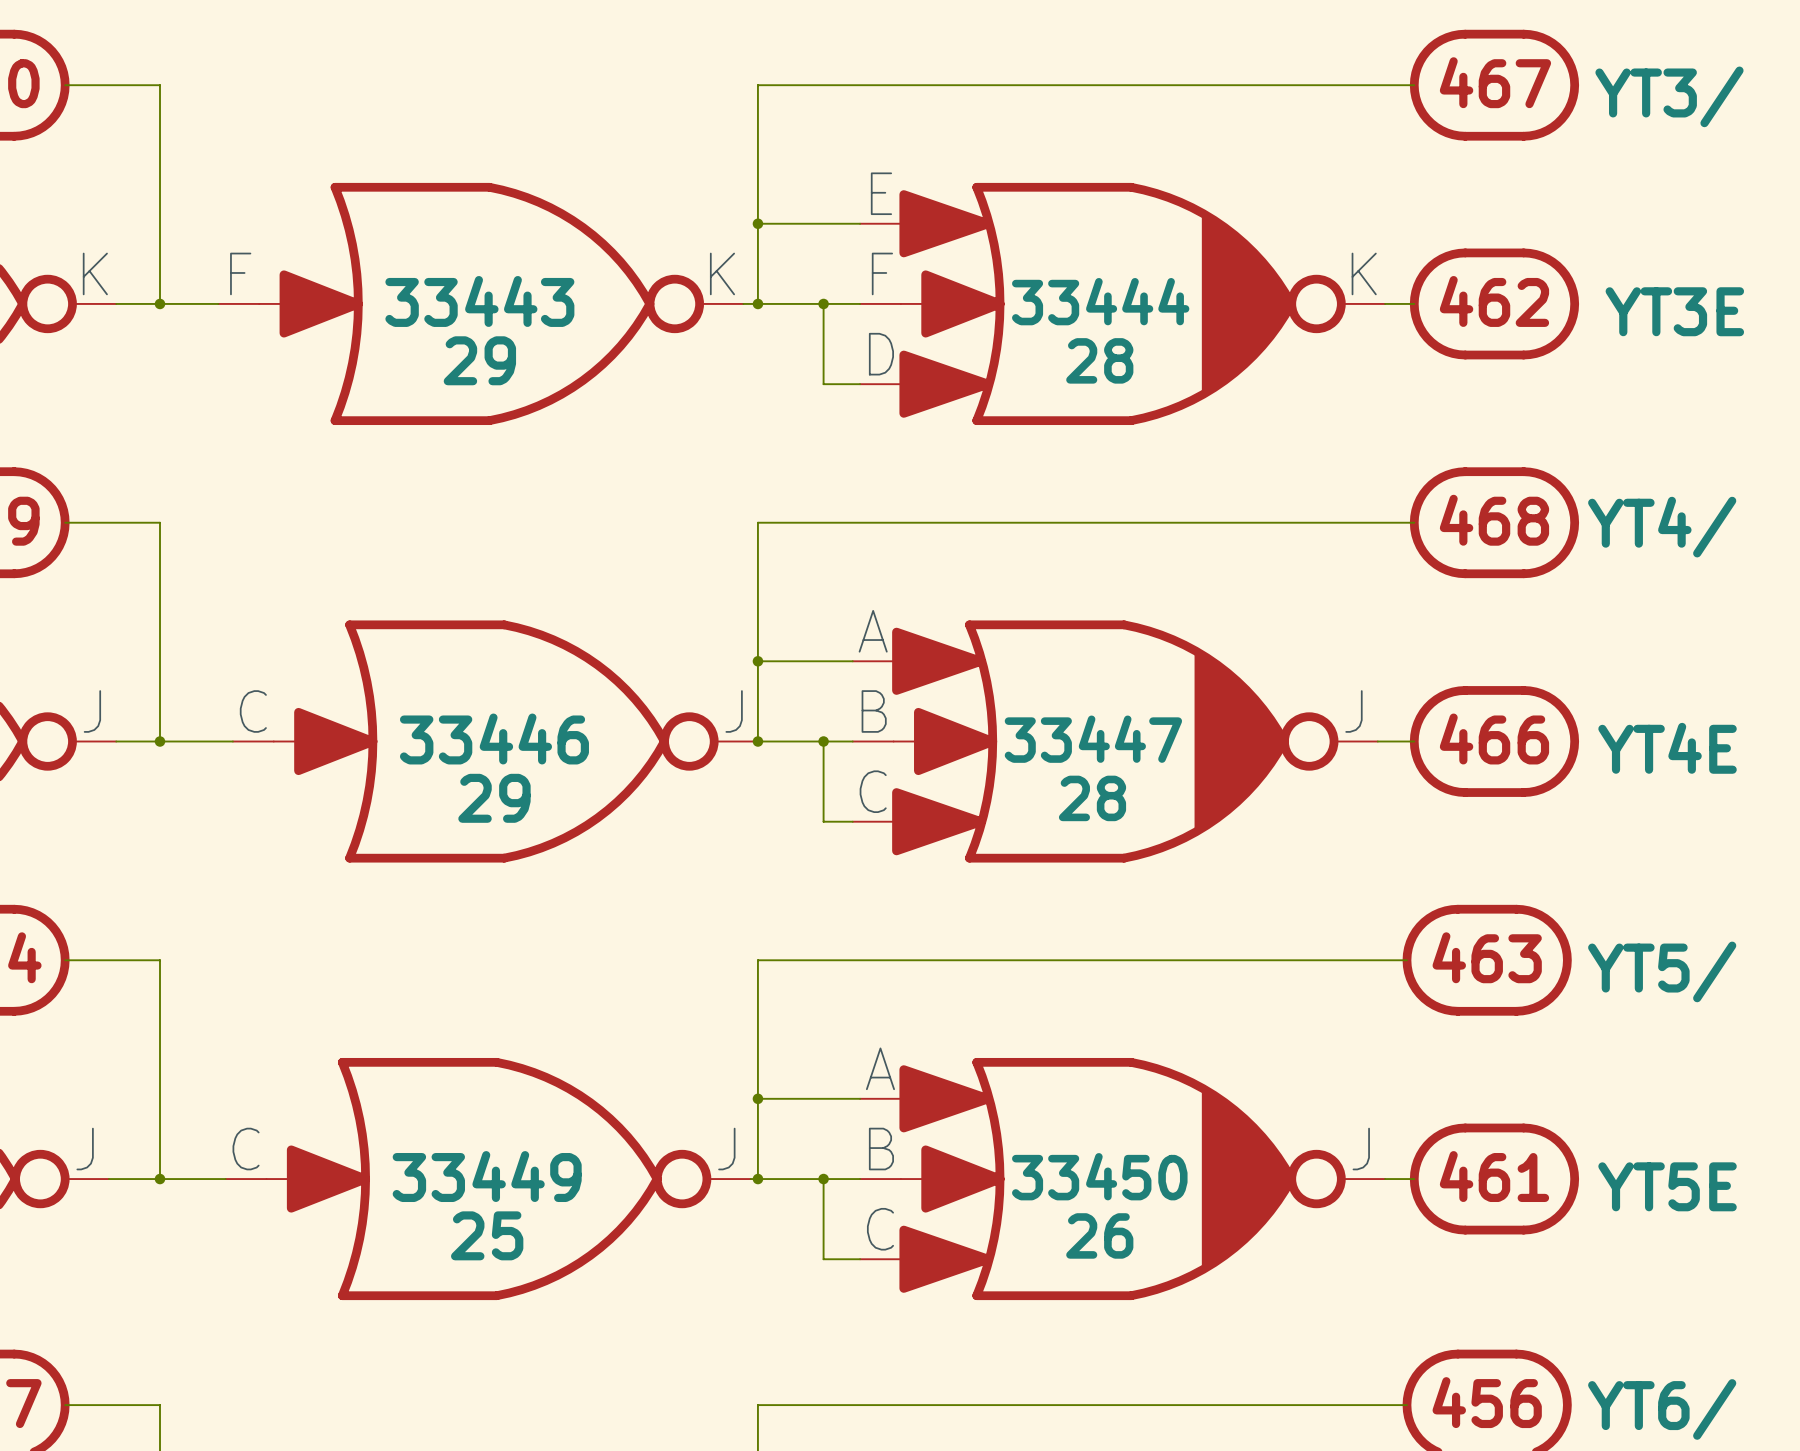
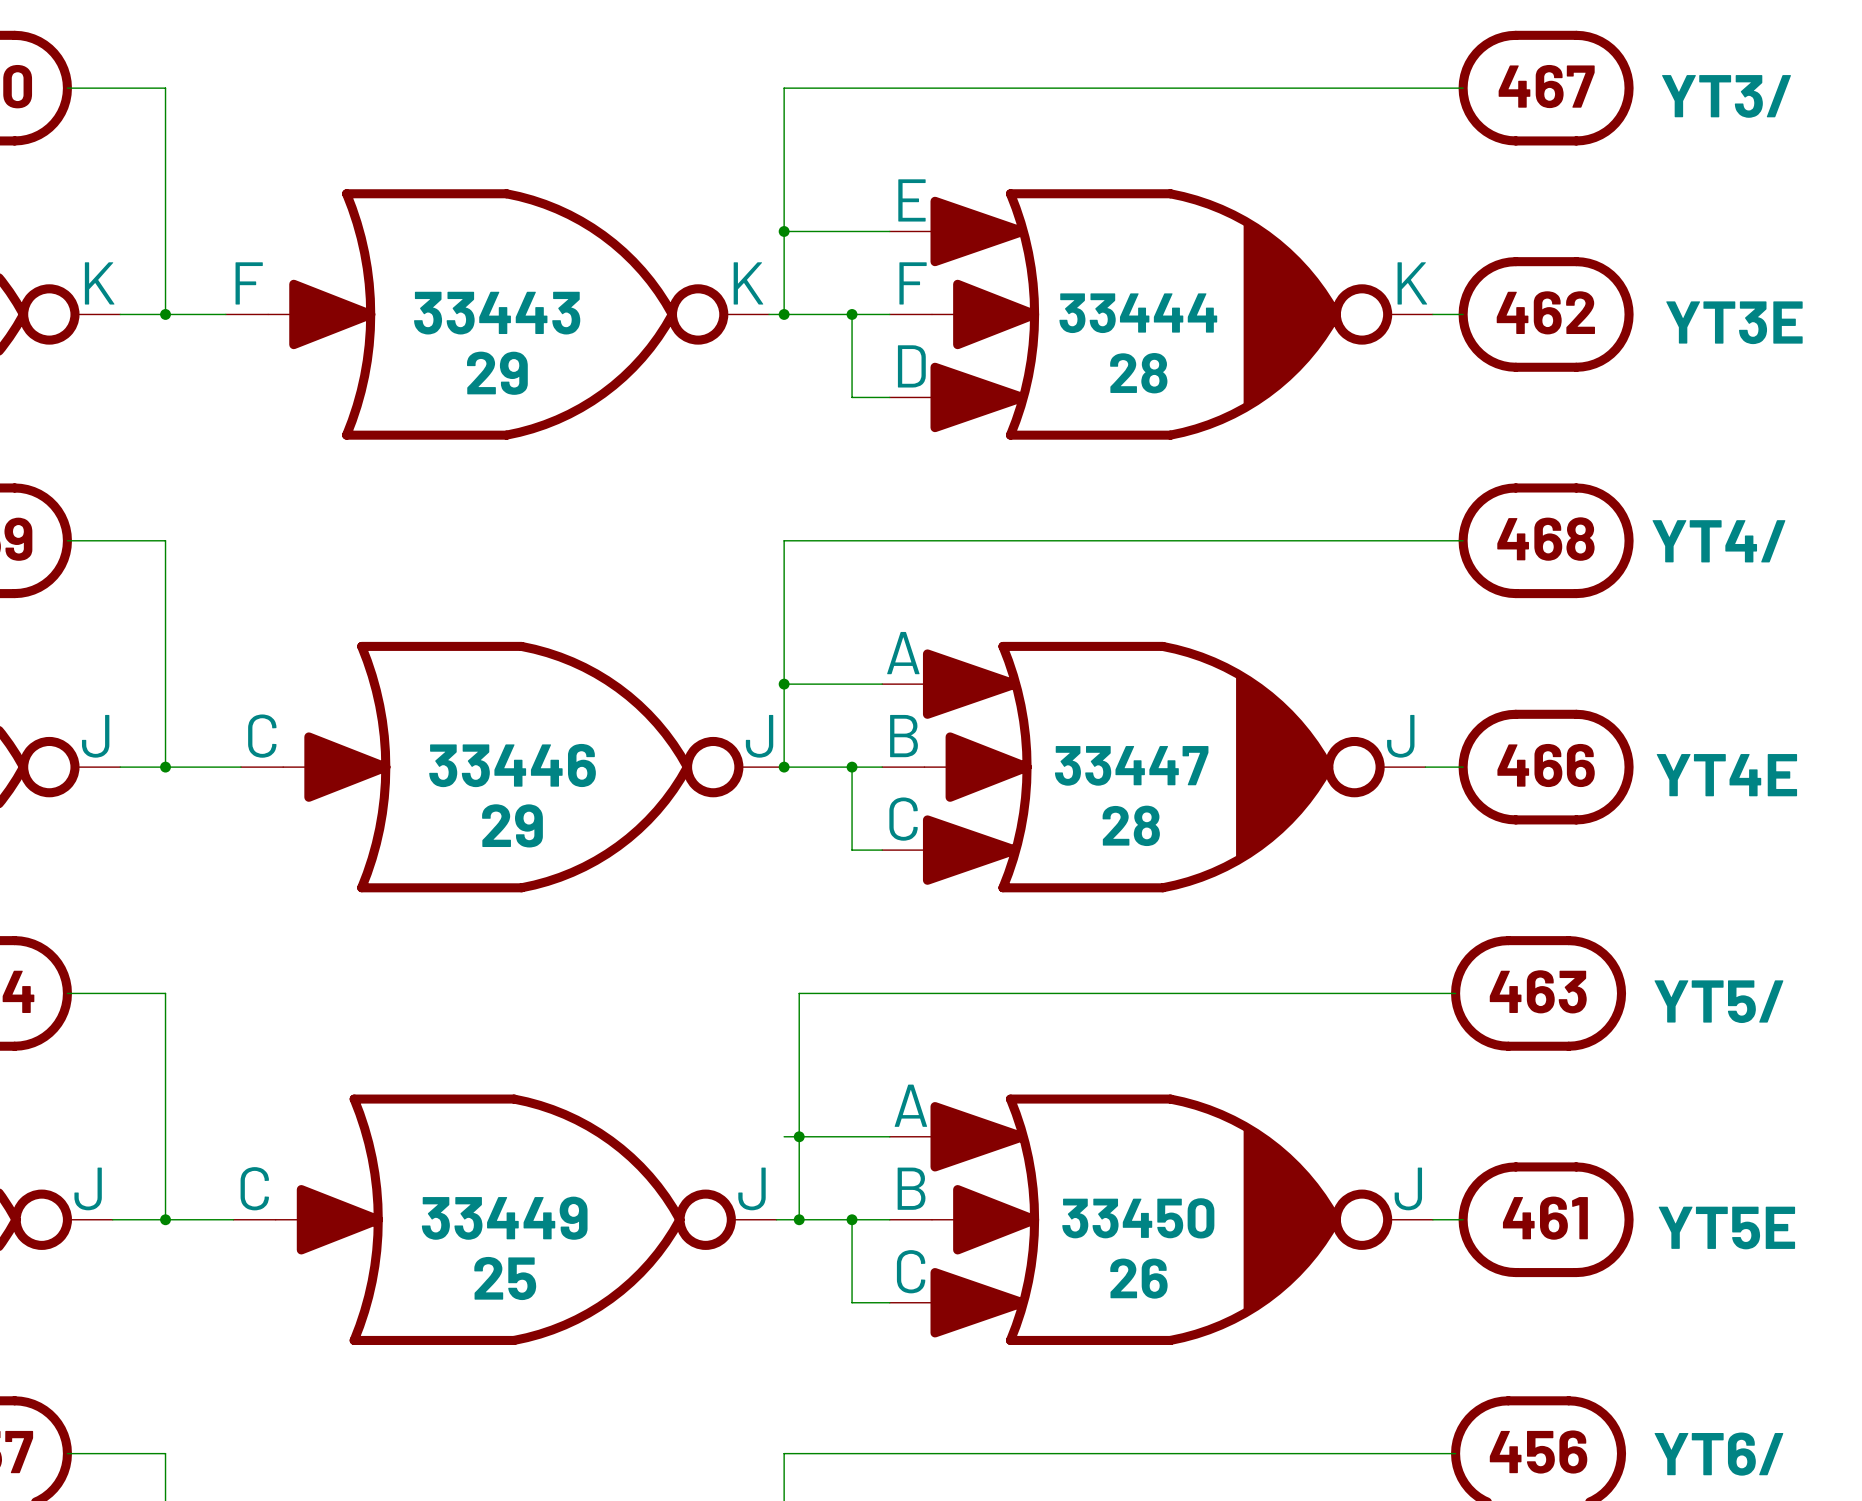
wire: (772, 960) (757, 960) (757, 1179) -> (799, 993) (799, 1219)
junction position: (757, 1098) -> (799, 1136)
junction position: (757, 1179) -> (799, 1219)

